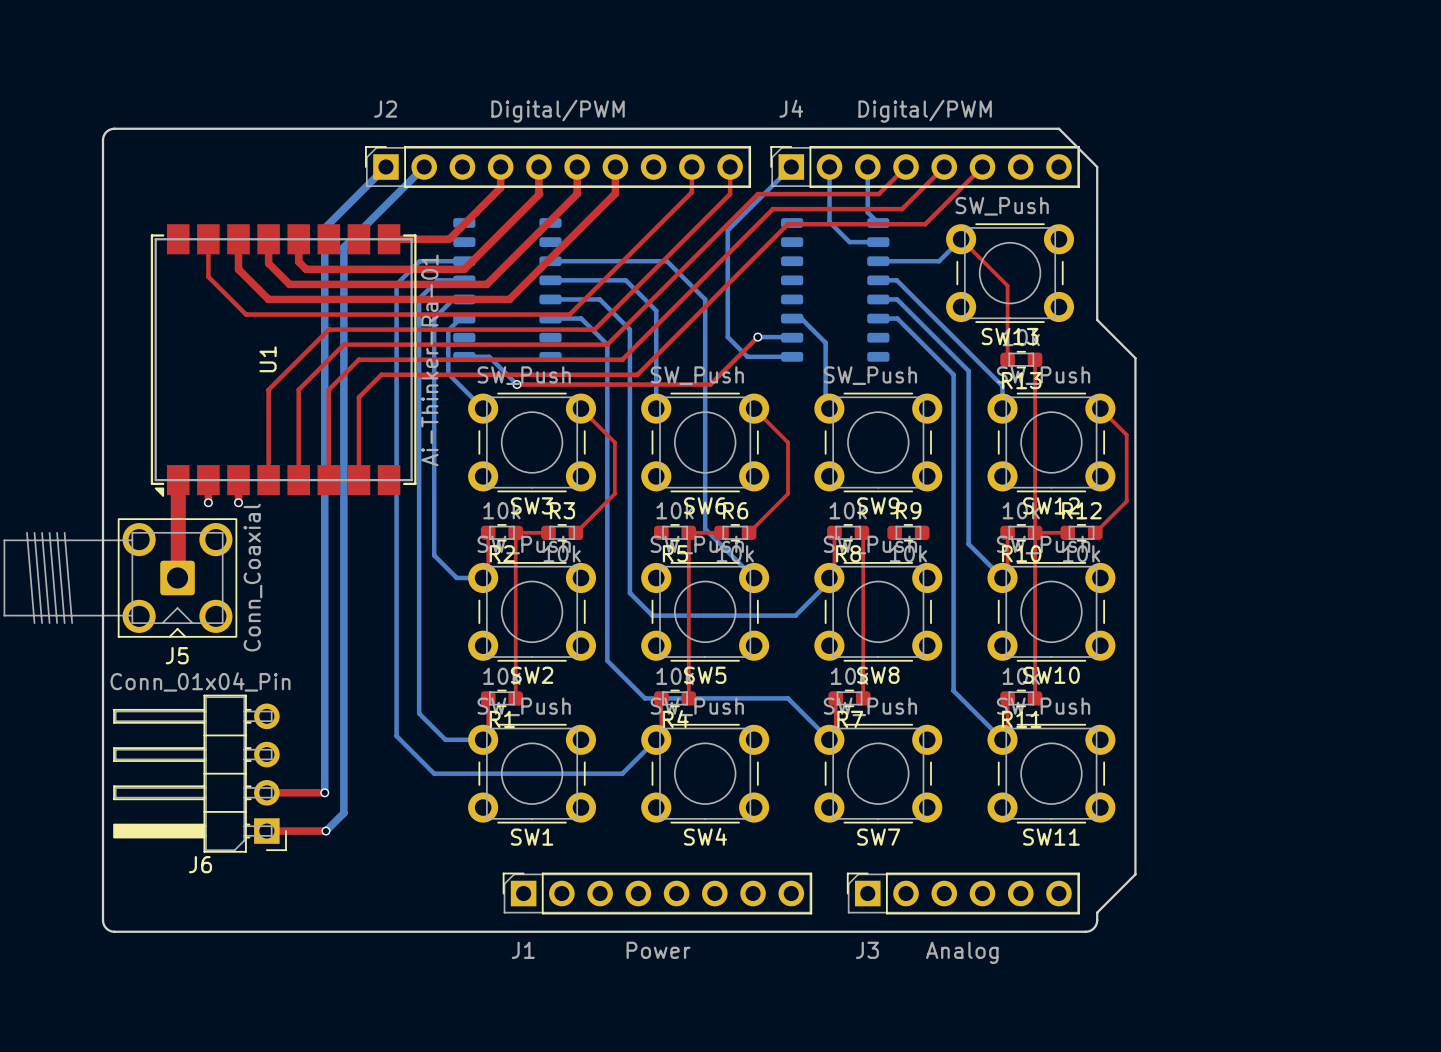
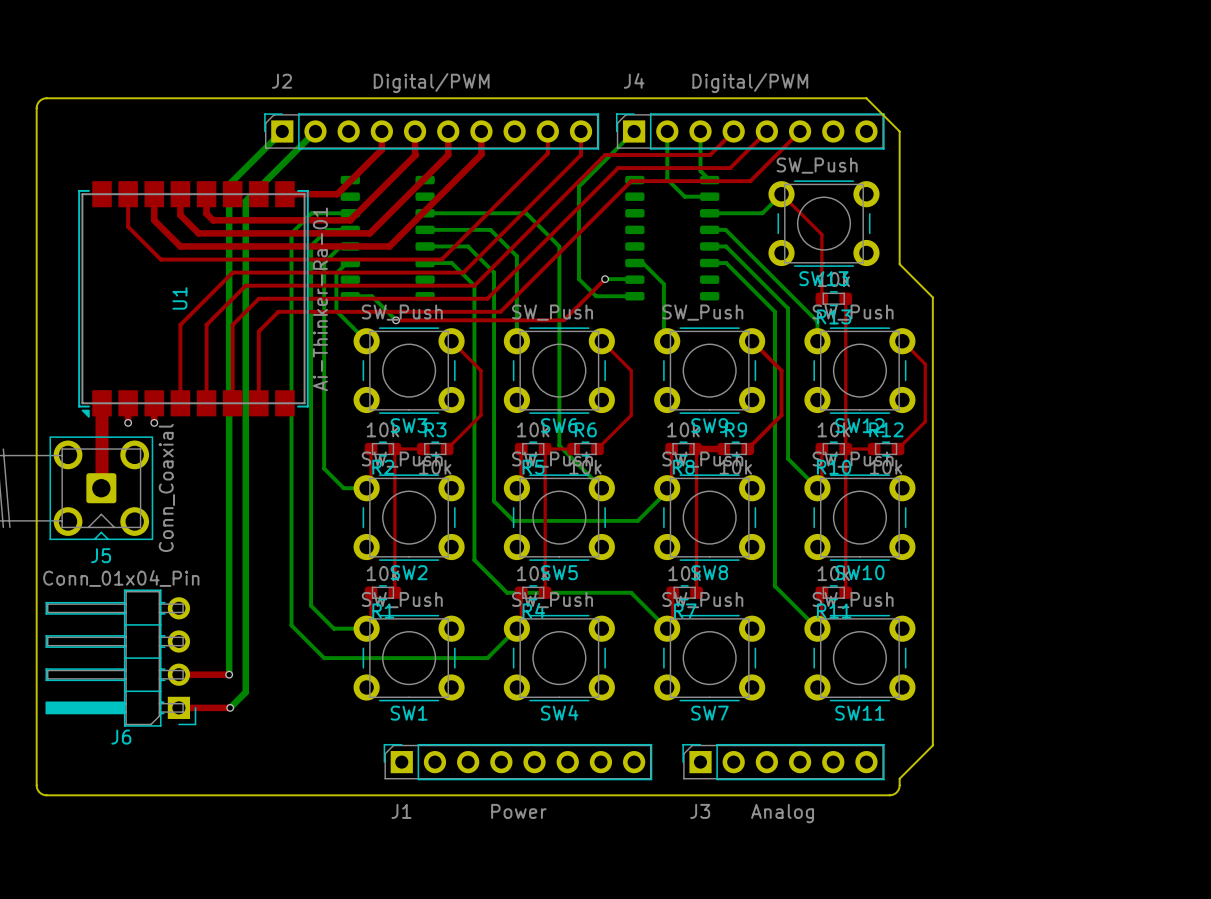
top track: none -> (752, 341) (781, 370) (781, 415) (747, 449)
top track: none -> (521, 449) (521, 483) (516, 488)
top track: none -> (695, 449) (723, 449)

